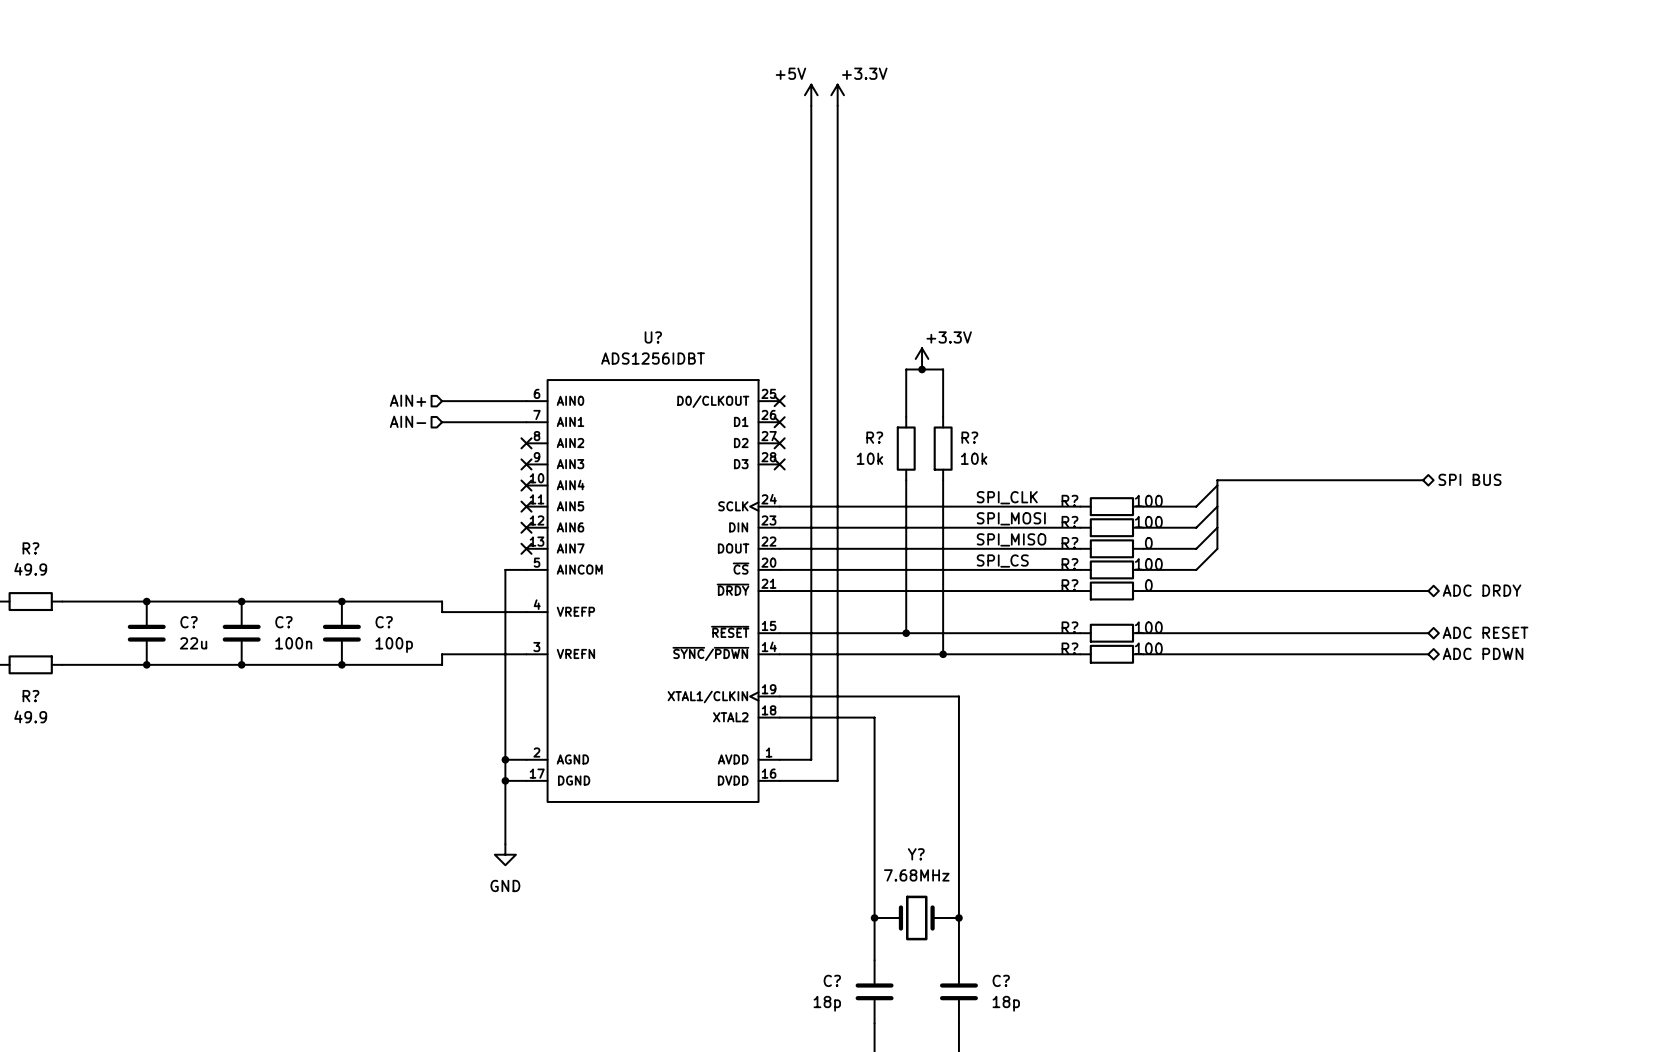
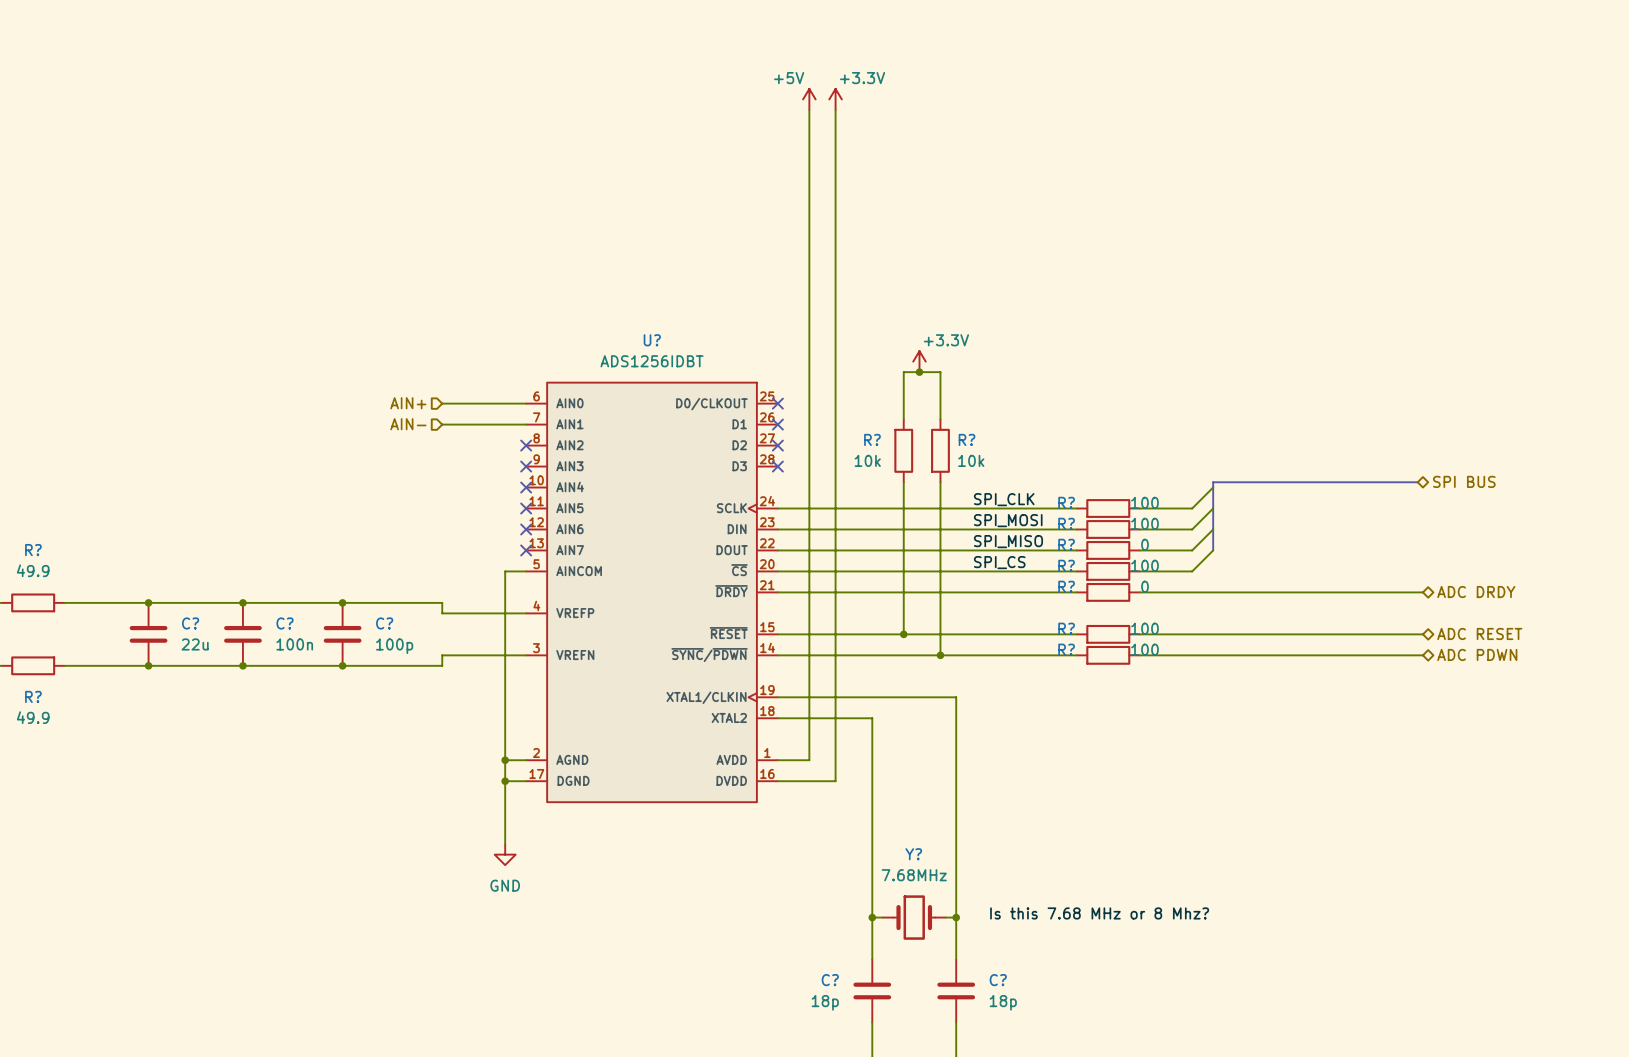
label: none -> Is this 7.68 MHz or 8 Mhz? (1099, 913)

